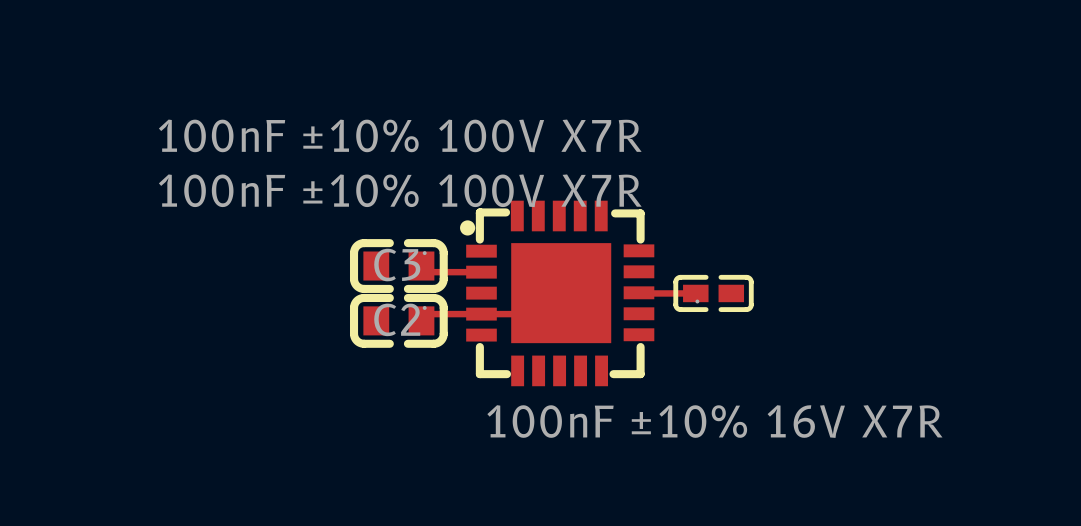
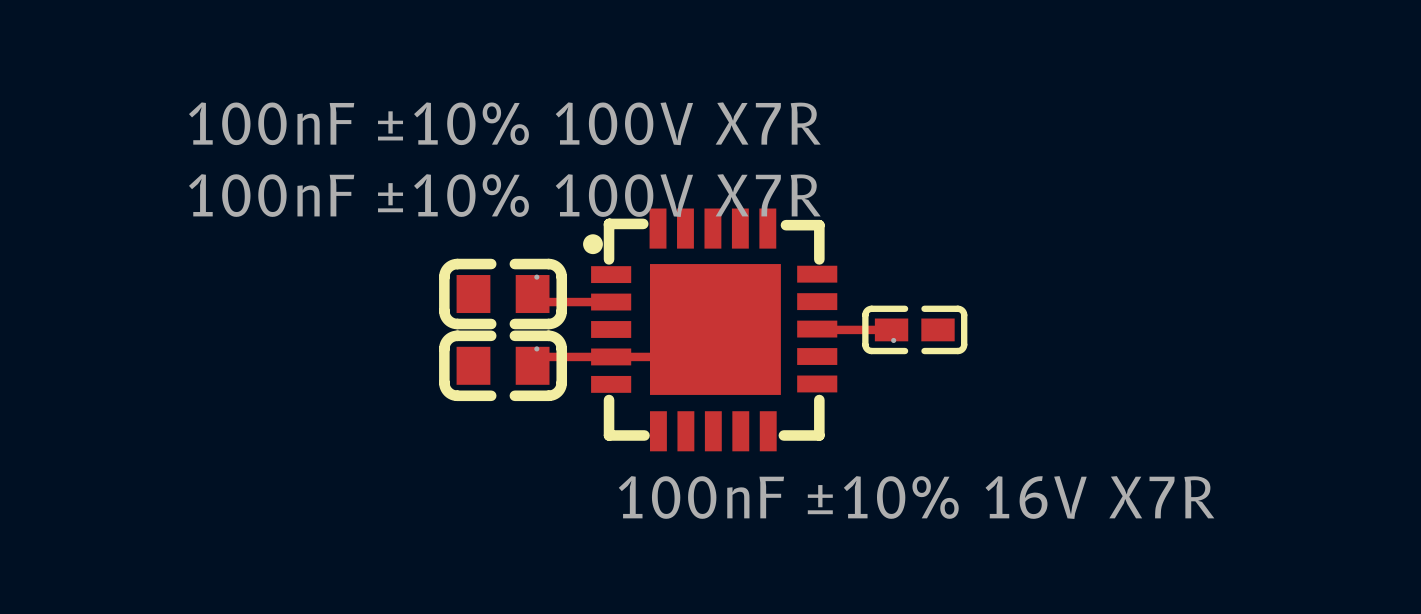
C3 name: C3 (397, 265) -> none
C2 name: C2 (397, 319) -> none

